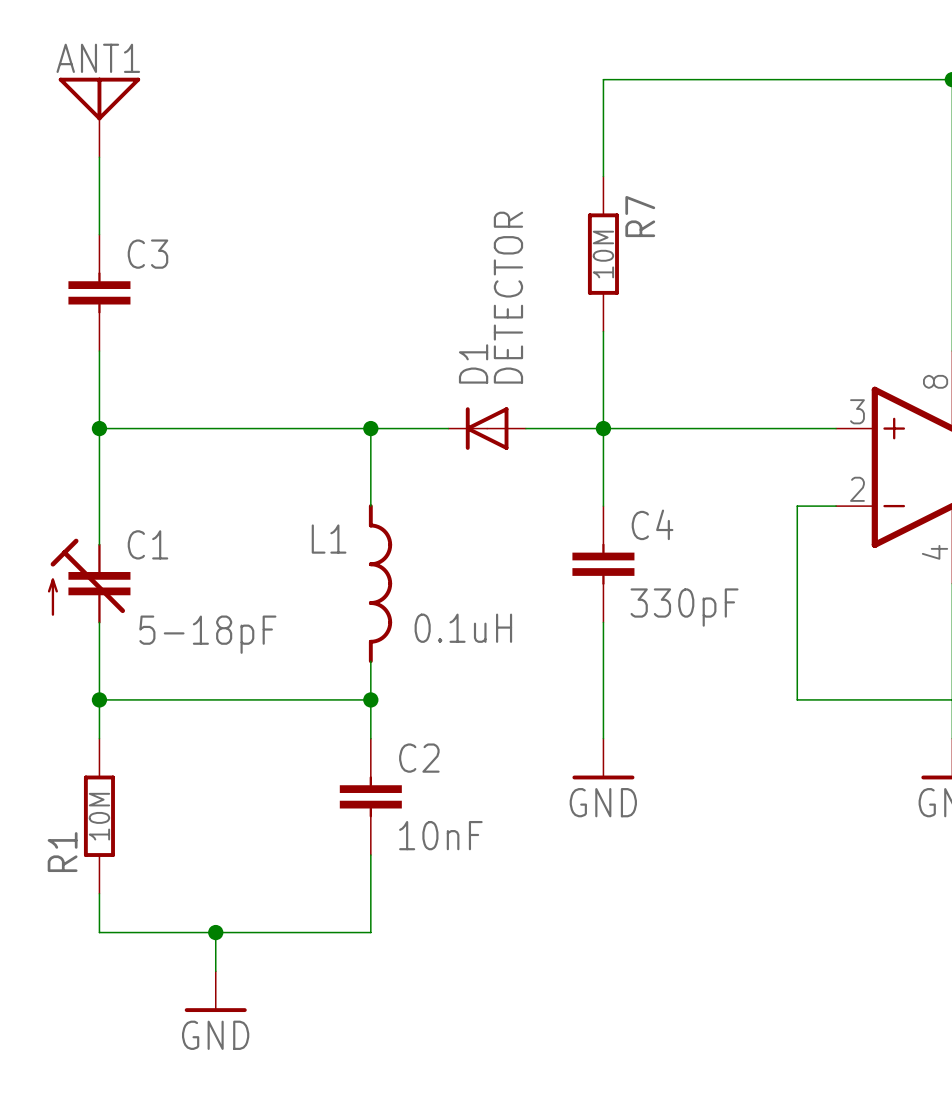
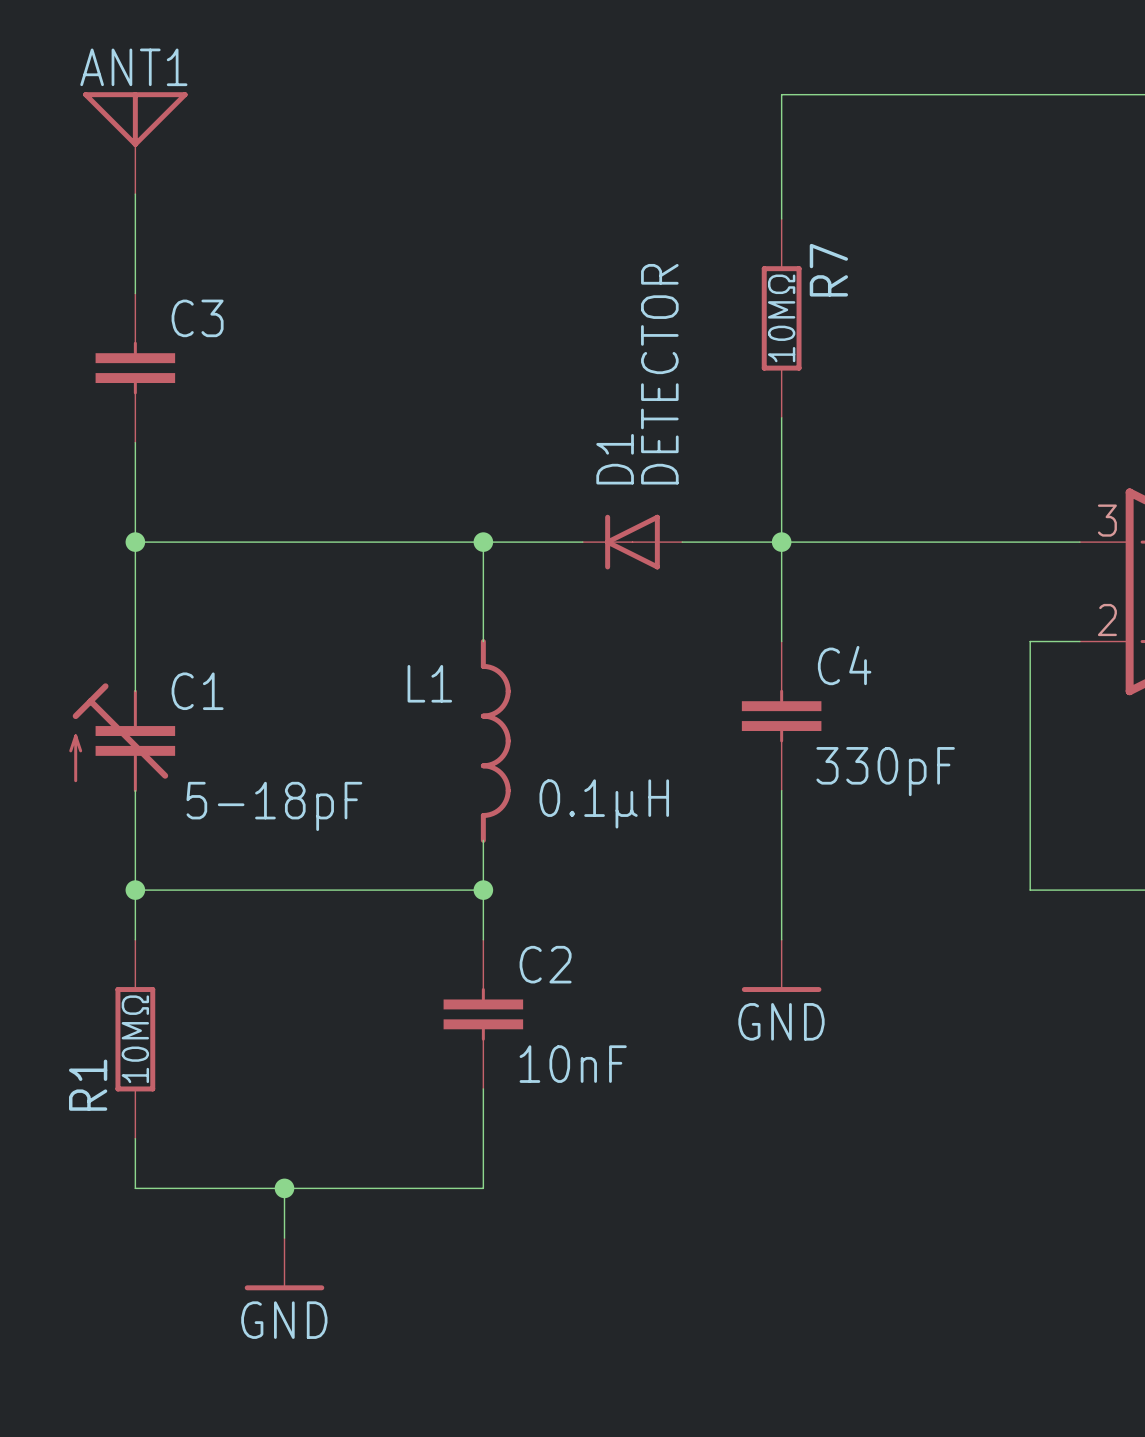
R7 value: 10M (603, 254) -> 10MΩ (781, 318)
L1 value: 0.1uH (463, 628) -> 0.1μH (604, 803)
R1 value: 10M (99, 816) -> 10MΩ (135, 1039)

